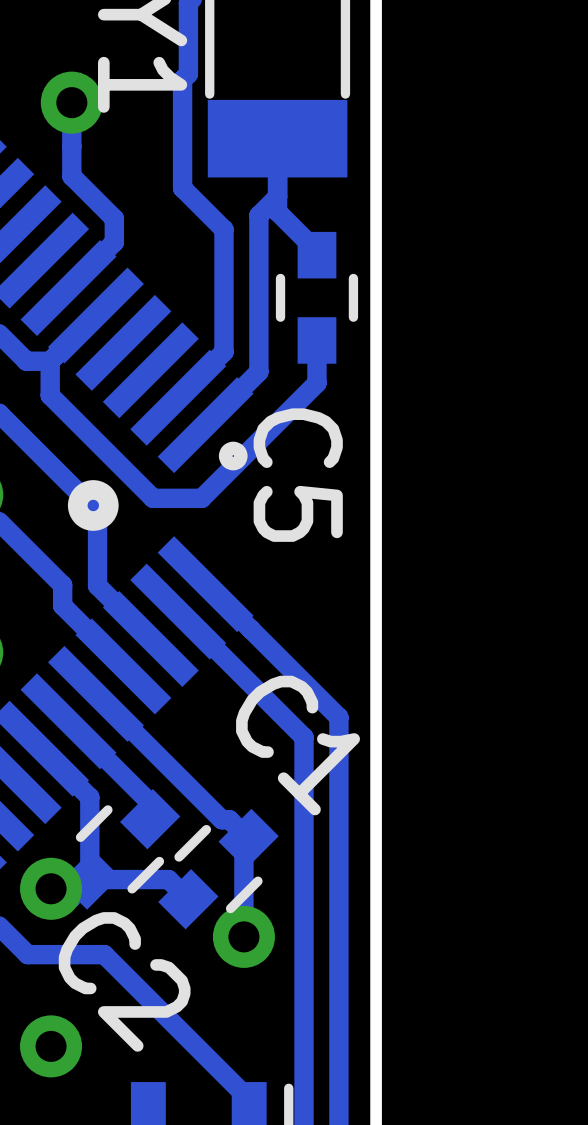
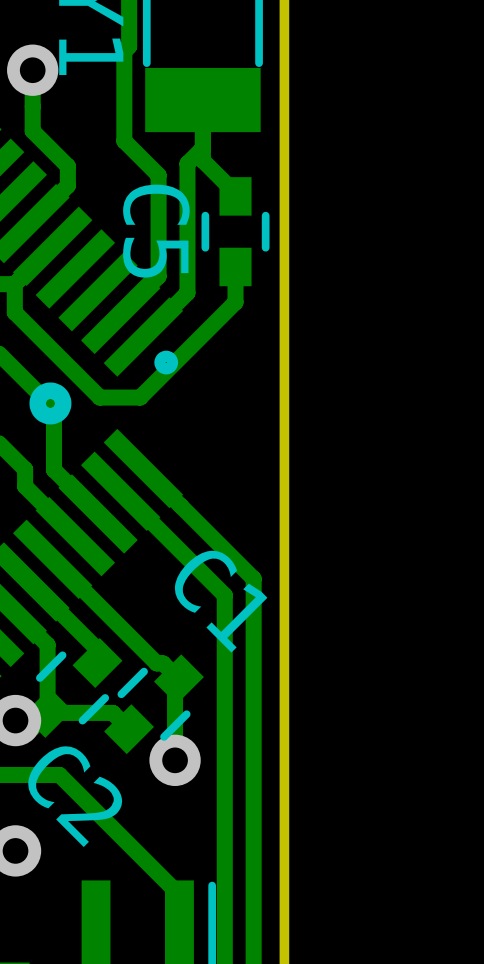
C5 name position: C5 (298, 475) -> C5 (156, 231)

